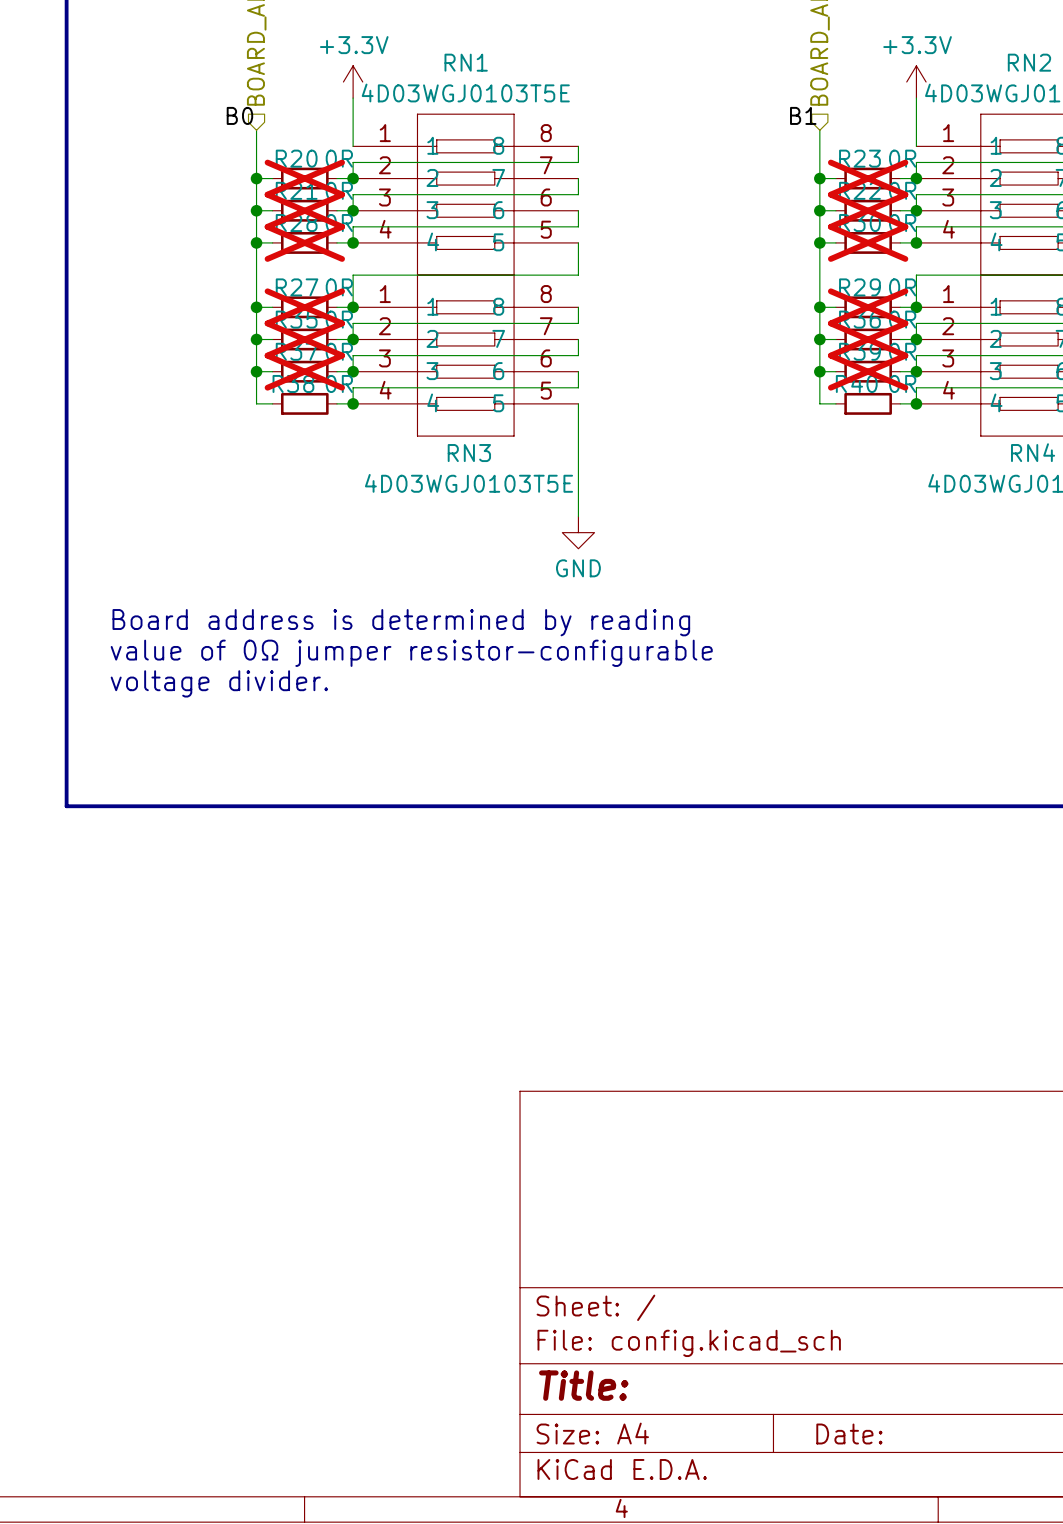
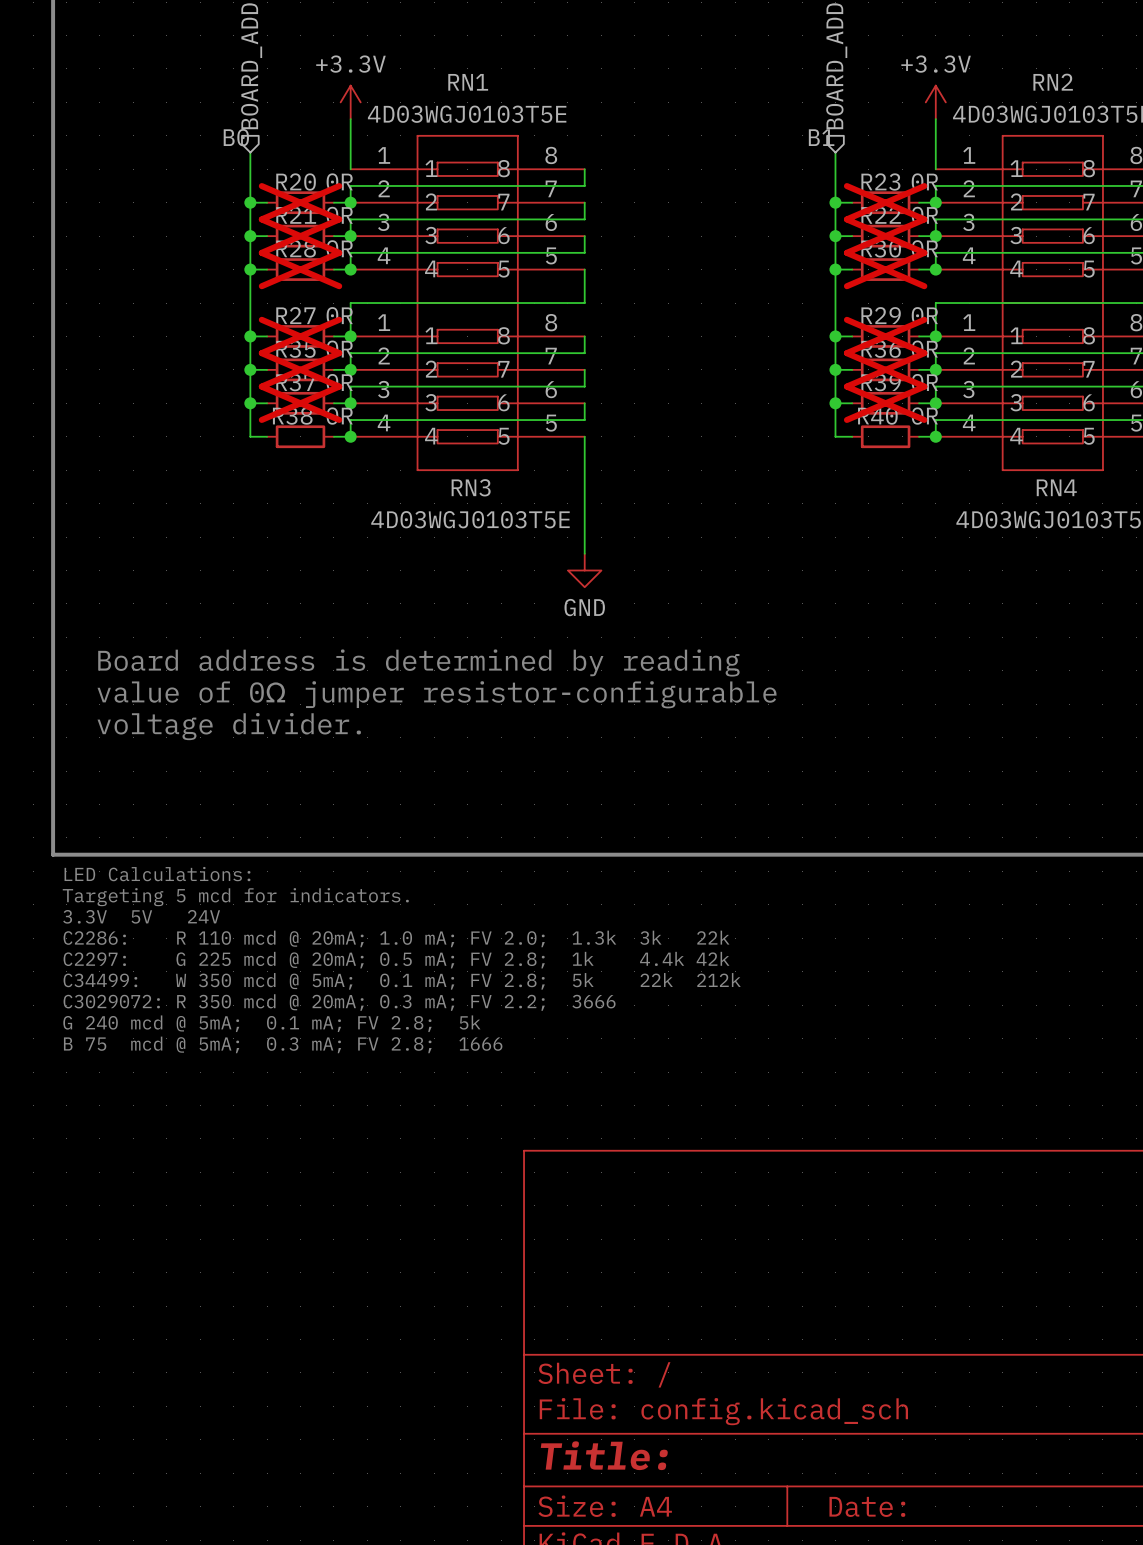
text: none -> LED Calculations: (157, 874)
text: none -> Targeting 5 mcd for indicators. (235, 897)
text: none -> 3.3V 5V 24V (141, 916)
text: none -> C2286: R 110 mcd @ 20mA; 1.0 mA; FV 2.0; 1.3k 3k 22k (396, 938)
text: none -> C2297: G 225 mcd @ 20mA; 0.5 mA; FV 2.8; 1k 4.4k 42k (396, 960)
text: none -> C34499: W 350 mcd @ 5mA; 0.1 mA; FV 2.8; 5k 22k 212k (402, 981)
text: none -> C3029072: R 350 mcd @ 20mA; 0.3 mA; FV 2.2; 3666 (339, 1002)
text: none -> G 240 mcd @ 5mA; 0.1 mA; FV 2.8; 5k (271, 1023)
text: none -> B 75 mcd @ 5mA; 0.3 mA; FV 2.8; 1666 (283, 1044)

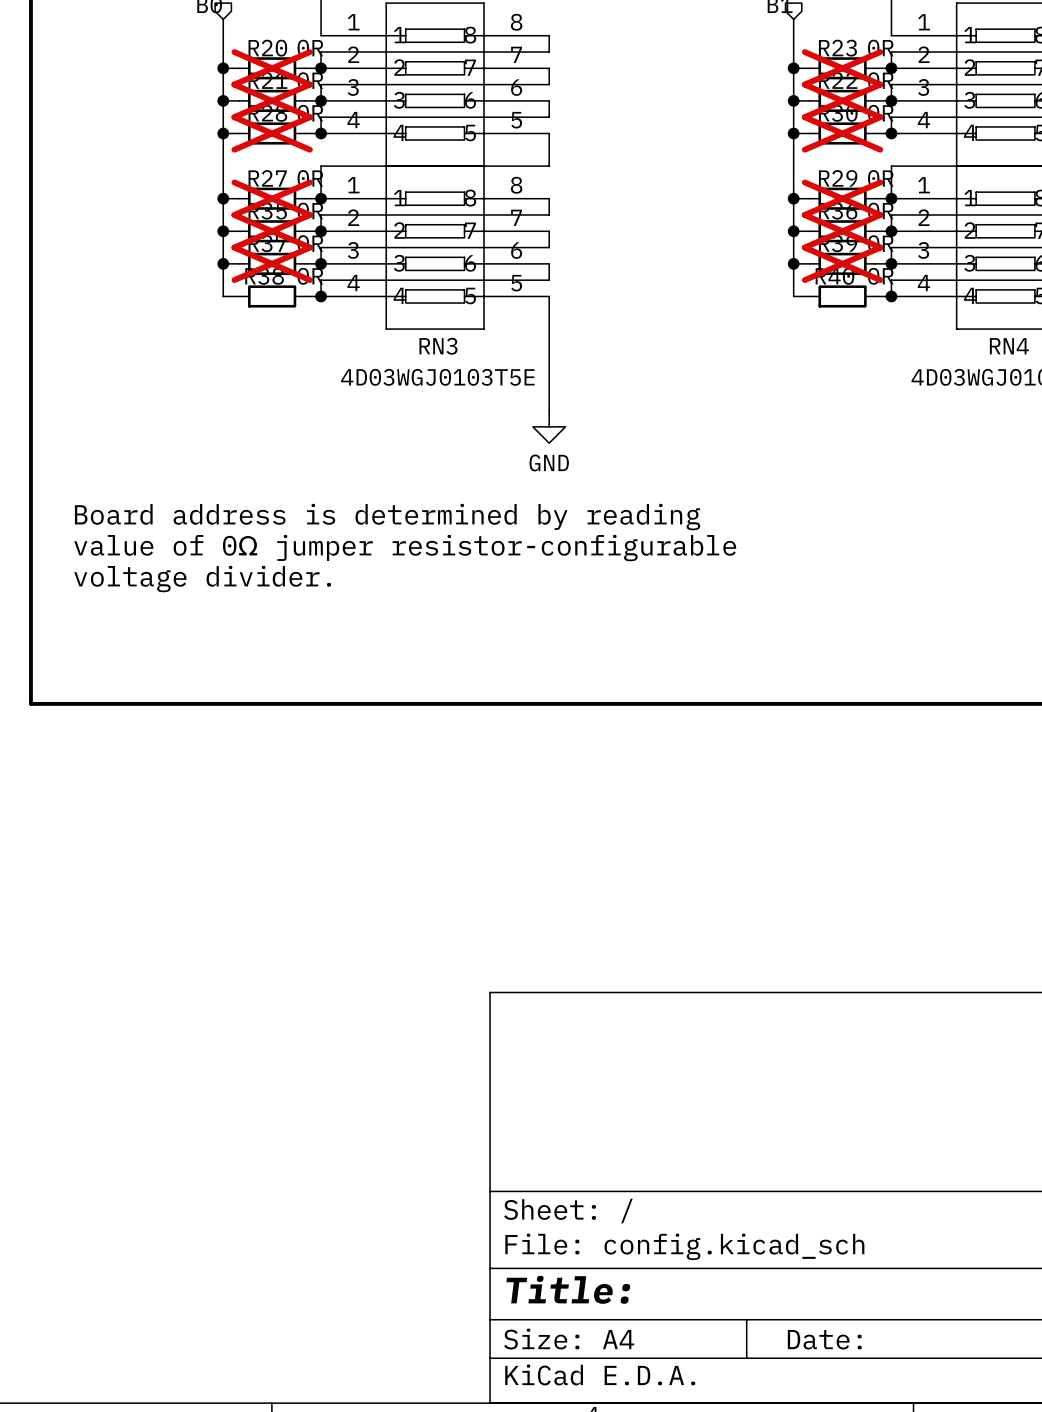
text: LED Calculations: (157, 874) -> none
text: Targeting 5 mcd for indicators. (235, 897) -> none
text: 3.3V 5V 24V (141, 916) -> none
text: C2286: R 110 mcd @ 20mA; 1.0 mA; FV 2.0; 1.3k 3k 22k (396, 938) -> none
text: C2297: G 225 mcd @ 20mA; 0.5 mA; FV 2.8; 1k 4.4k 42k (396, 960) -> none
text: C34499: W 350 mcd @ 5mA; 0.1 mA; FV 2.8; 5k 22k 212k (402, 981) -> none
text: C3029072: R 350 mcd @ 20mA; 0.3 mA; FV 2.2; 3666 (339, 1002) -> none
text: G 240 mcd @ 5mA; 0.1 mA; FV 2.8; 5k (271, 1023) -> none
text: B 75 mcd @ 5mA; 0.3 mA; FV 2.8; 1666 (283, 1044) -> none

